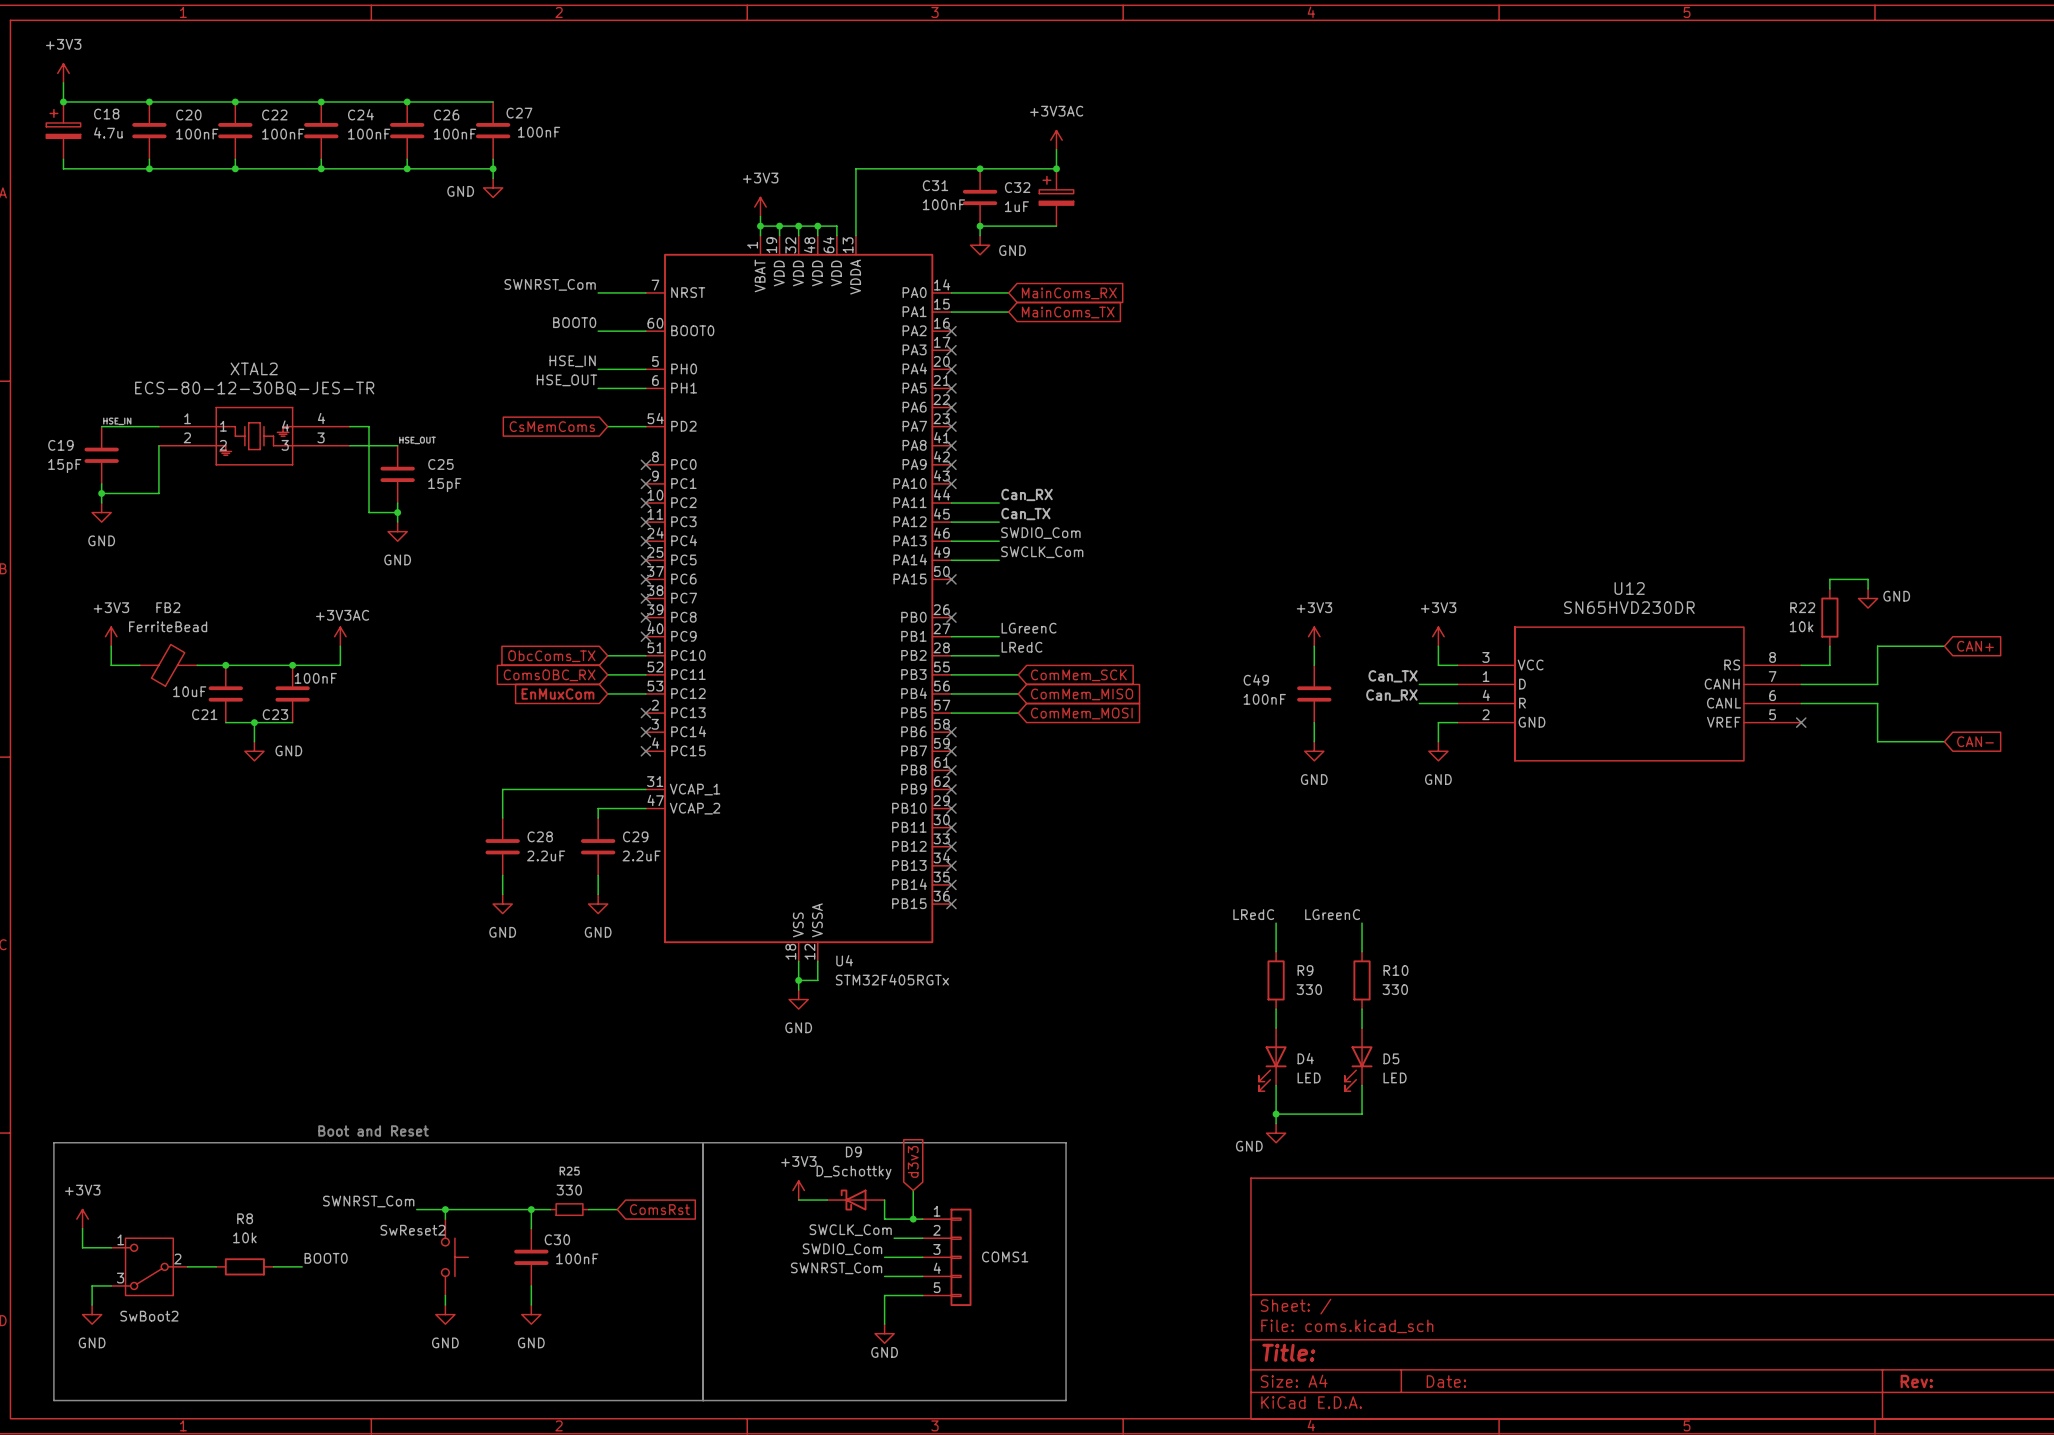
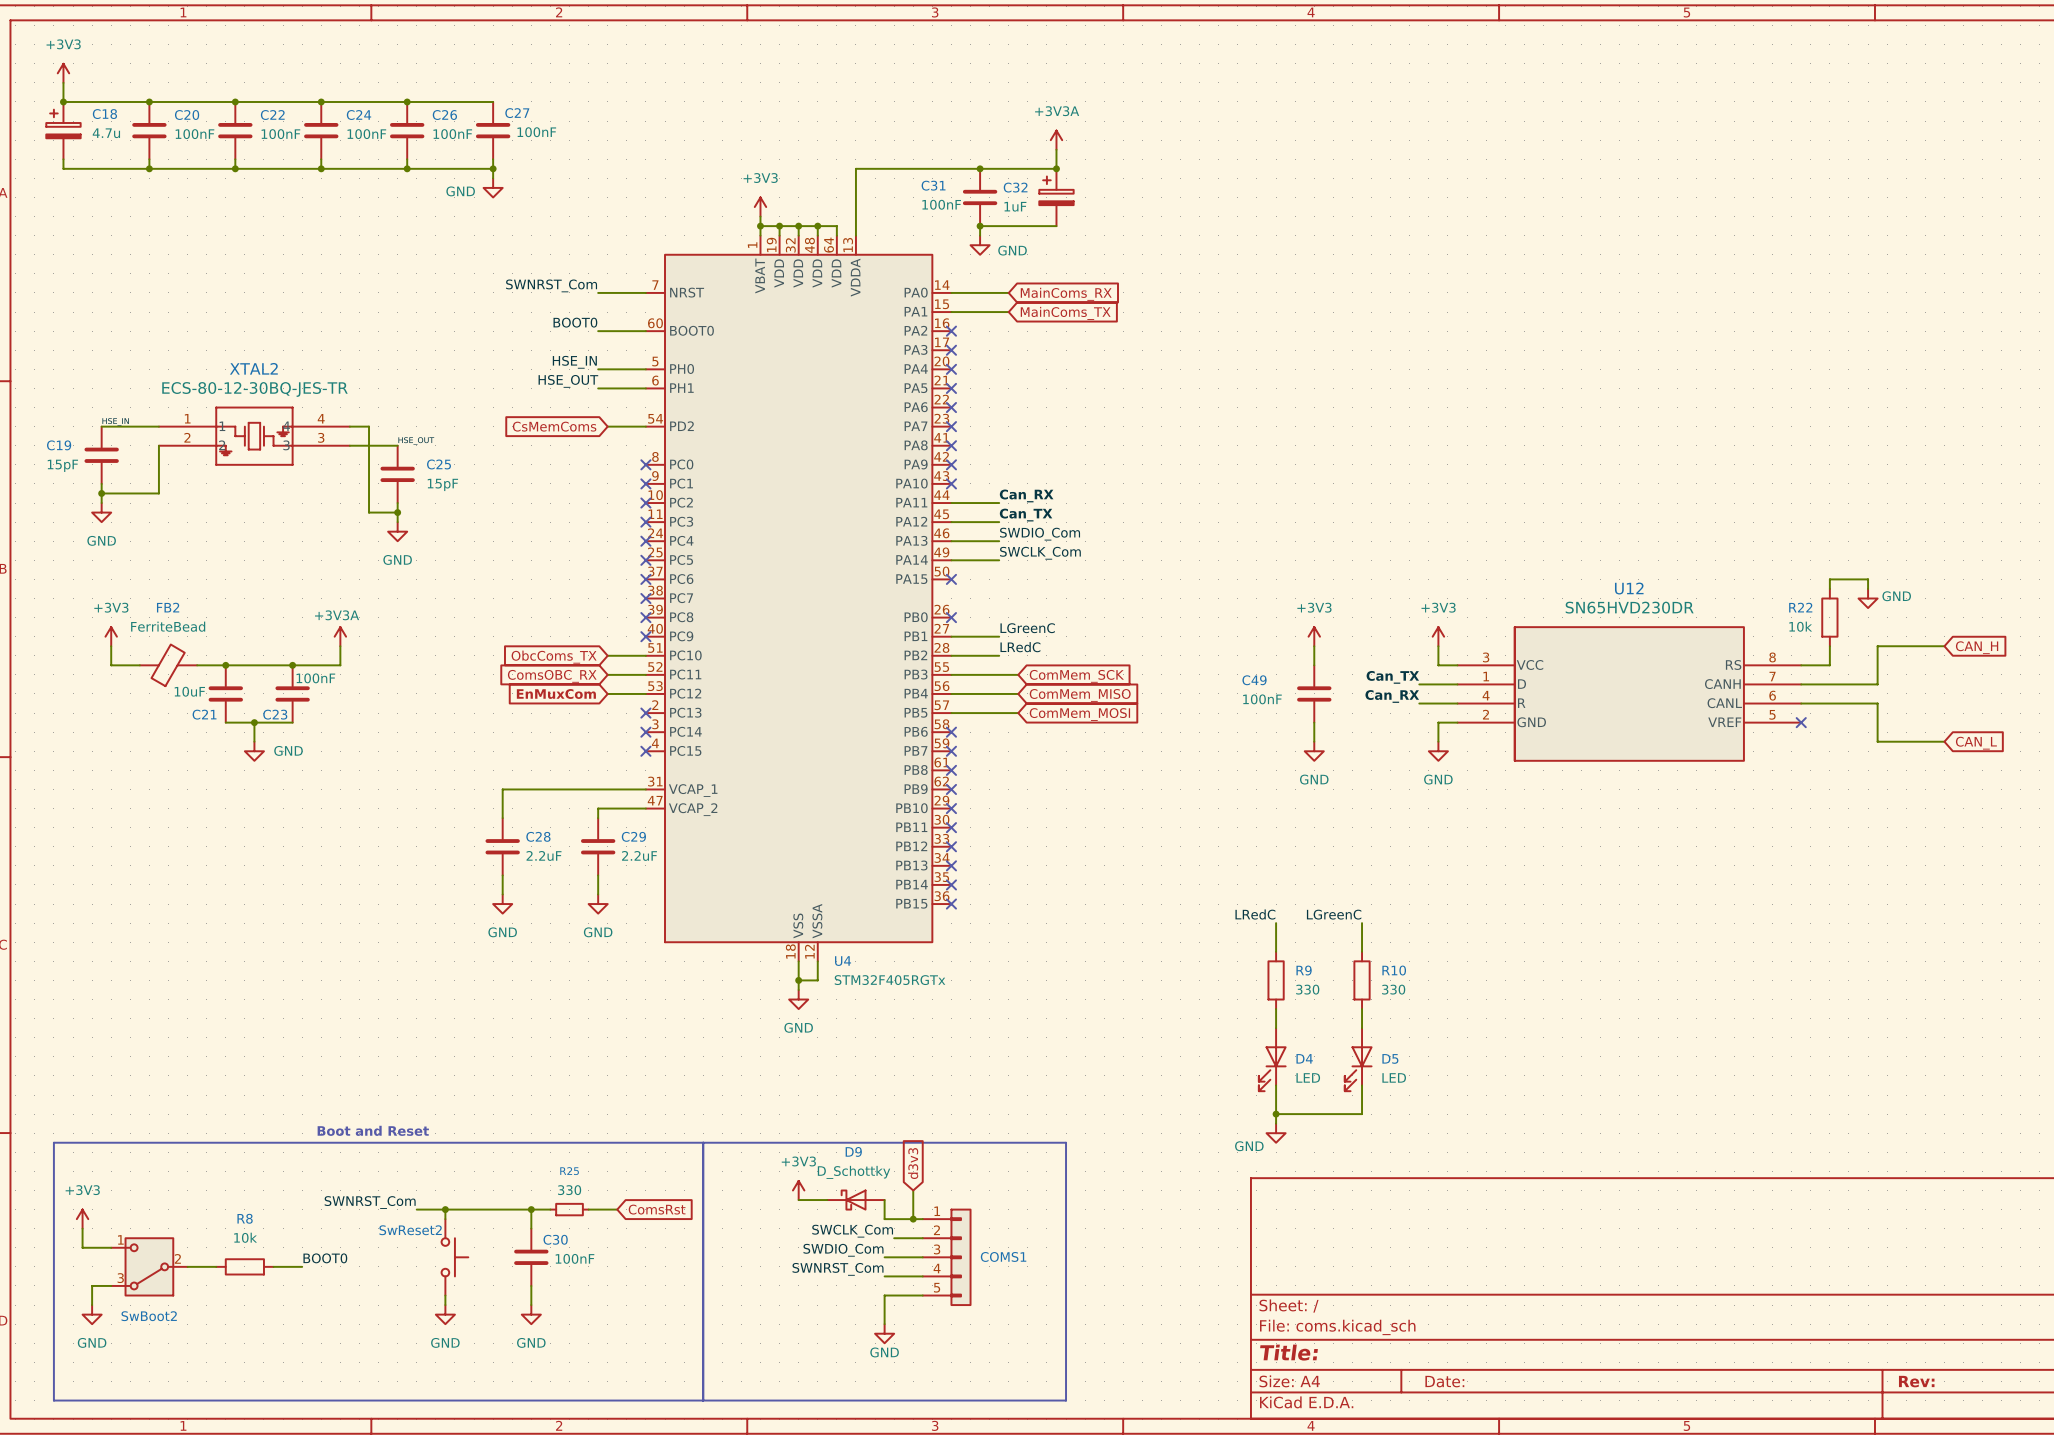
power symbol: +3V3AC (1056, 140) -> +3V3A (1056, 140)
power symbol: +3V3AC (340, 636) -> +3V3A (340, 636)
global label: CAN+ (1975, 646) -> CAN_H (1977, 647)
global label: CAN- (1975, 741) -> CAN_L (1976, 743)

